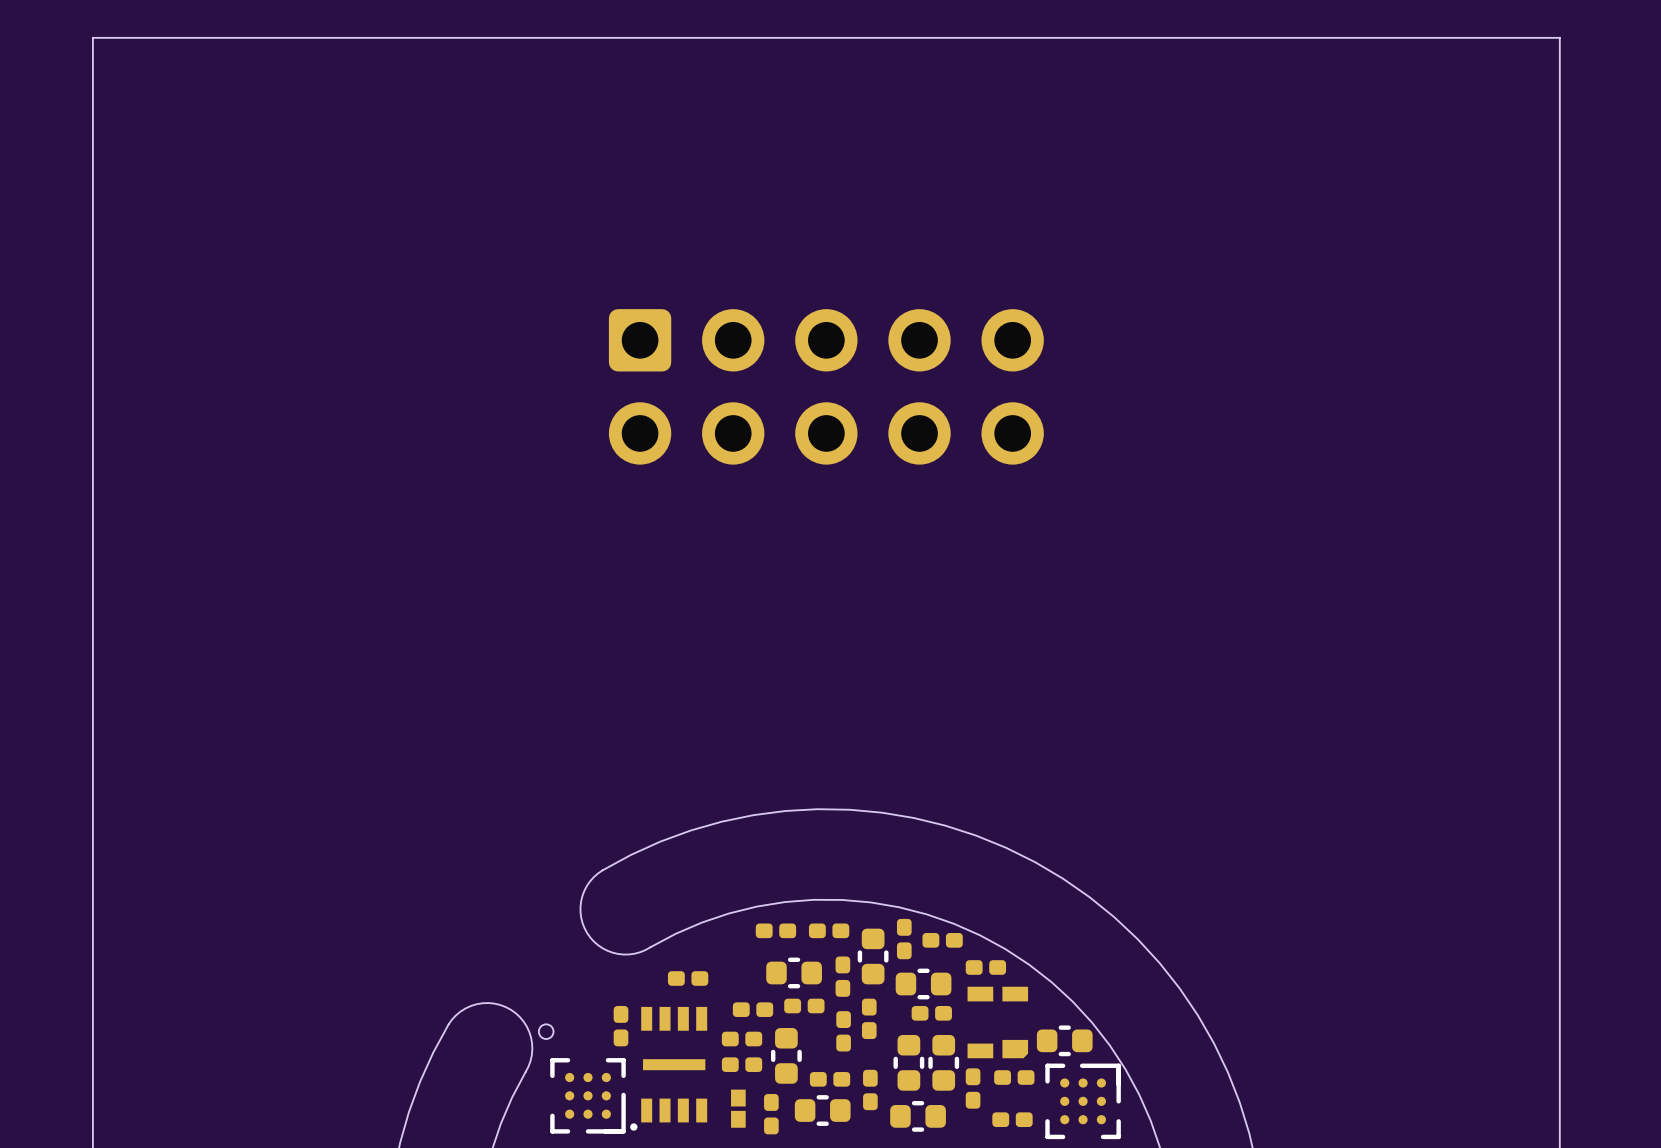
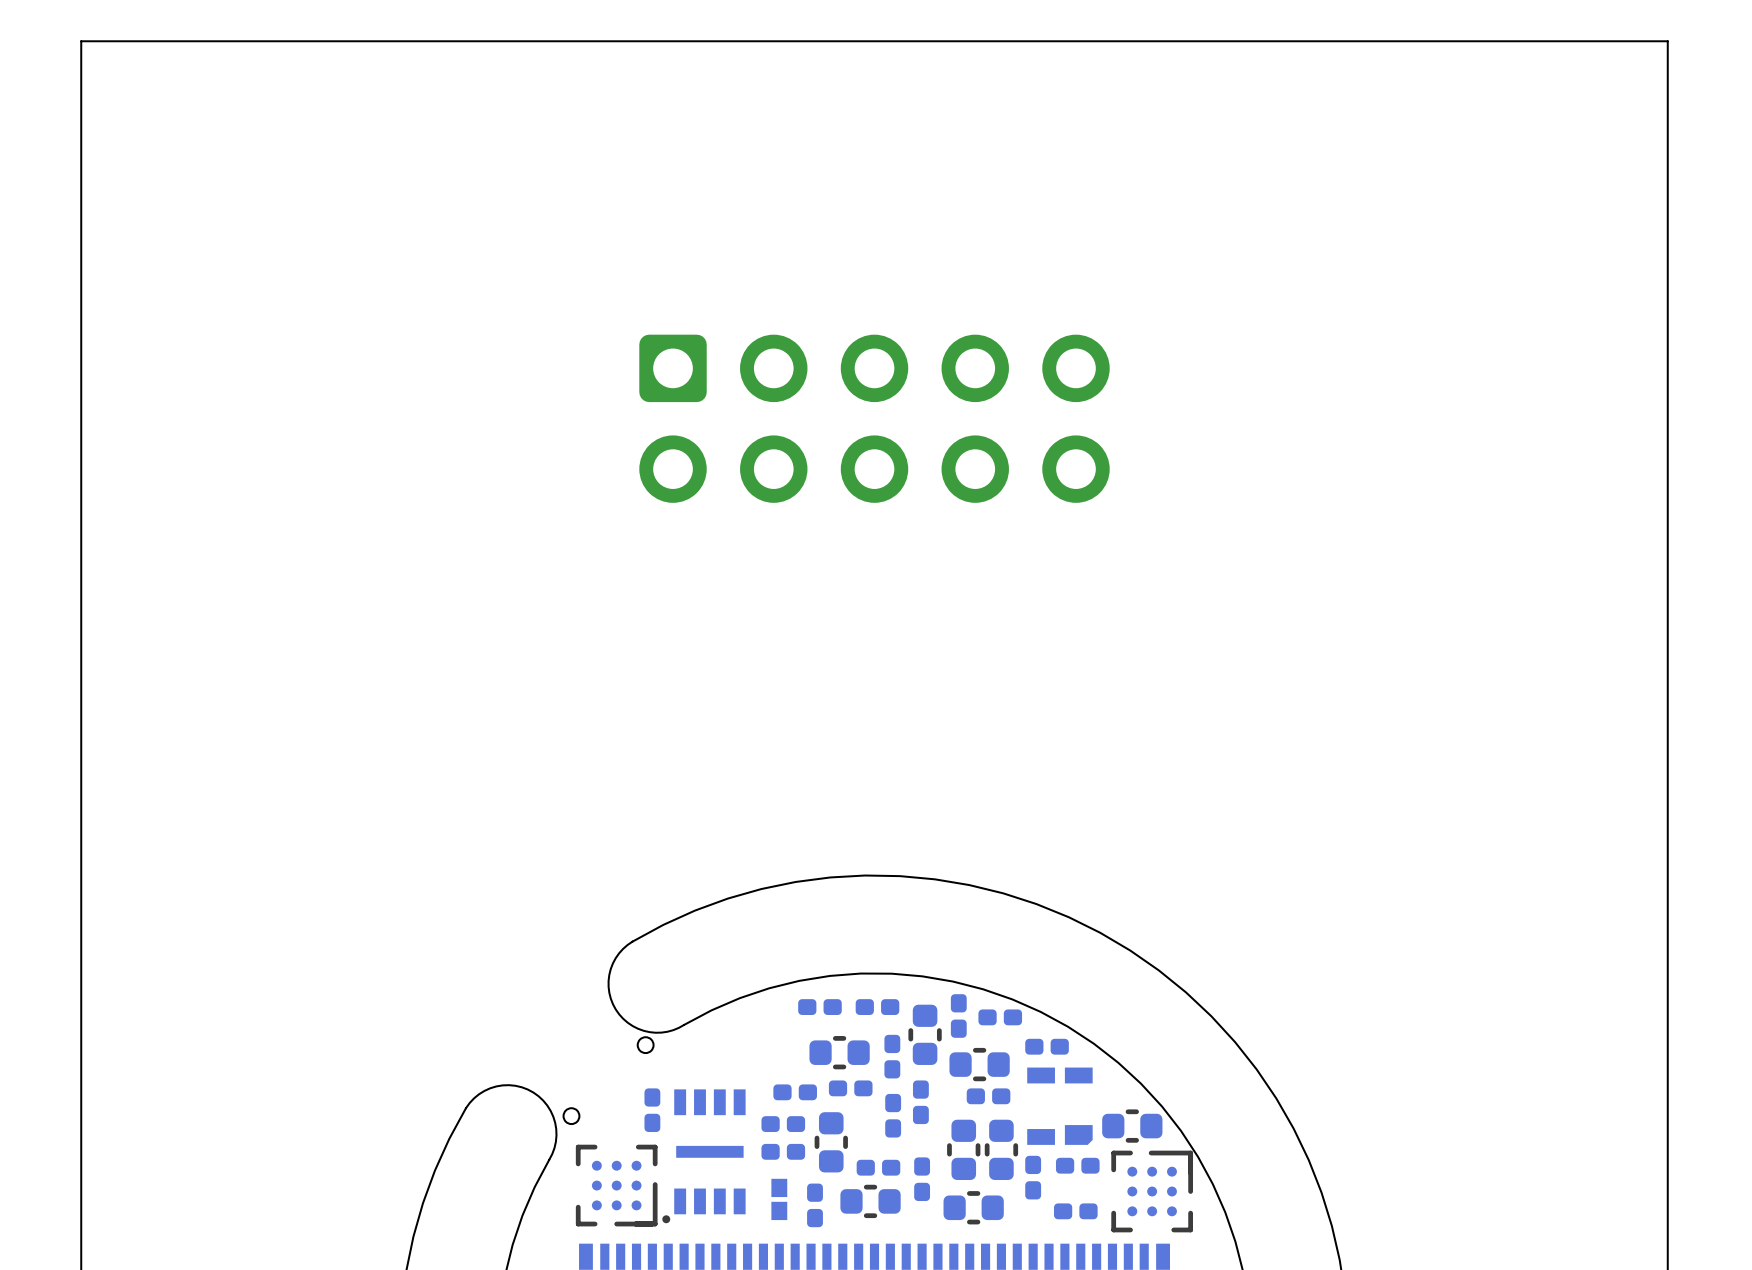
round board edge: none -> [636, 1036, 655, 1055]
part: (688, 978) -> none

